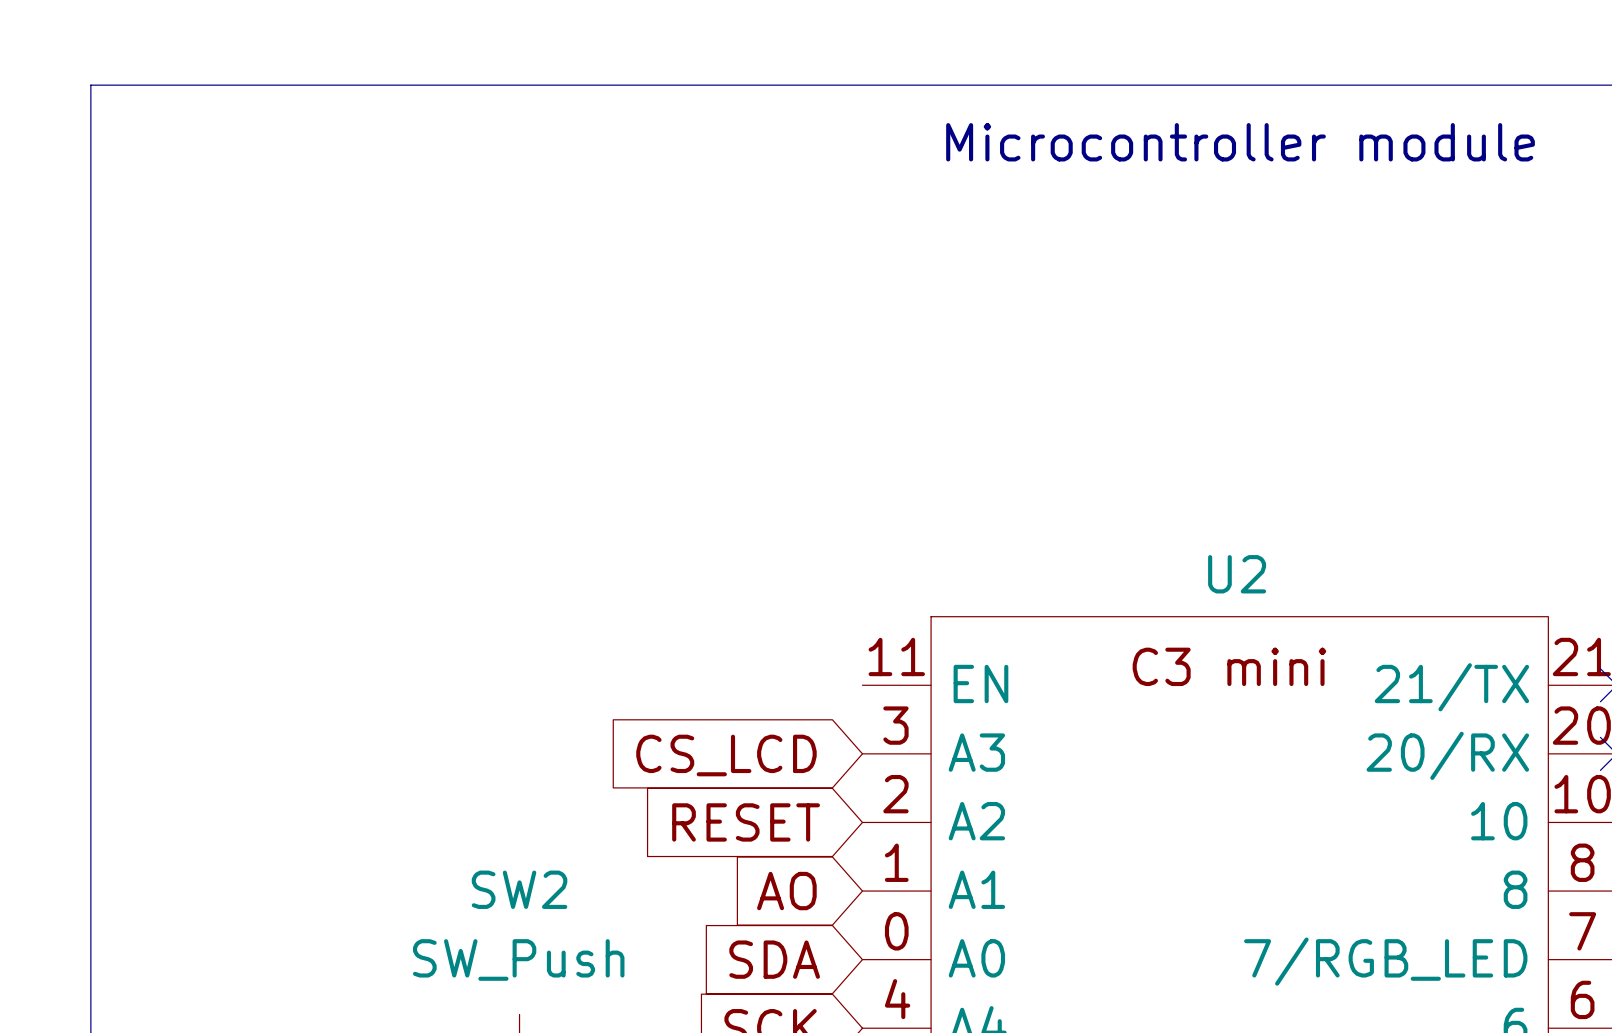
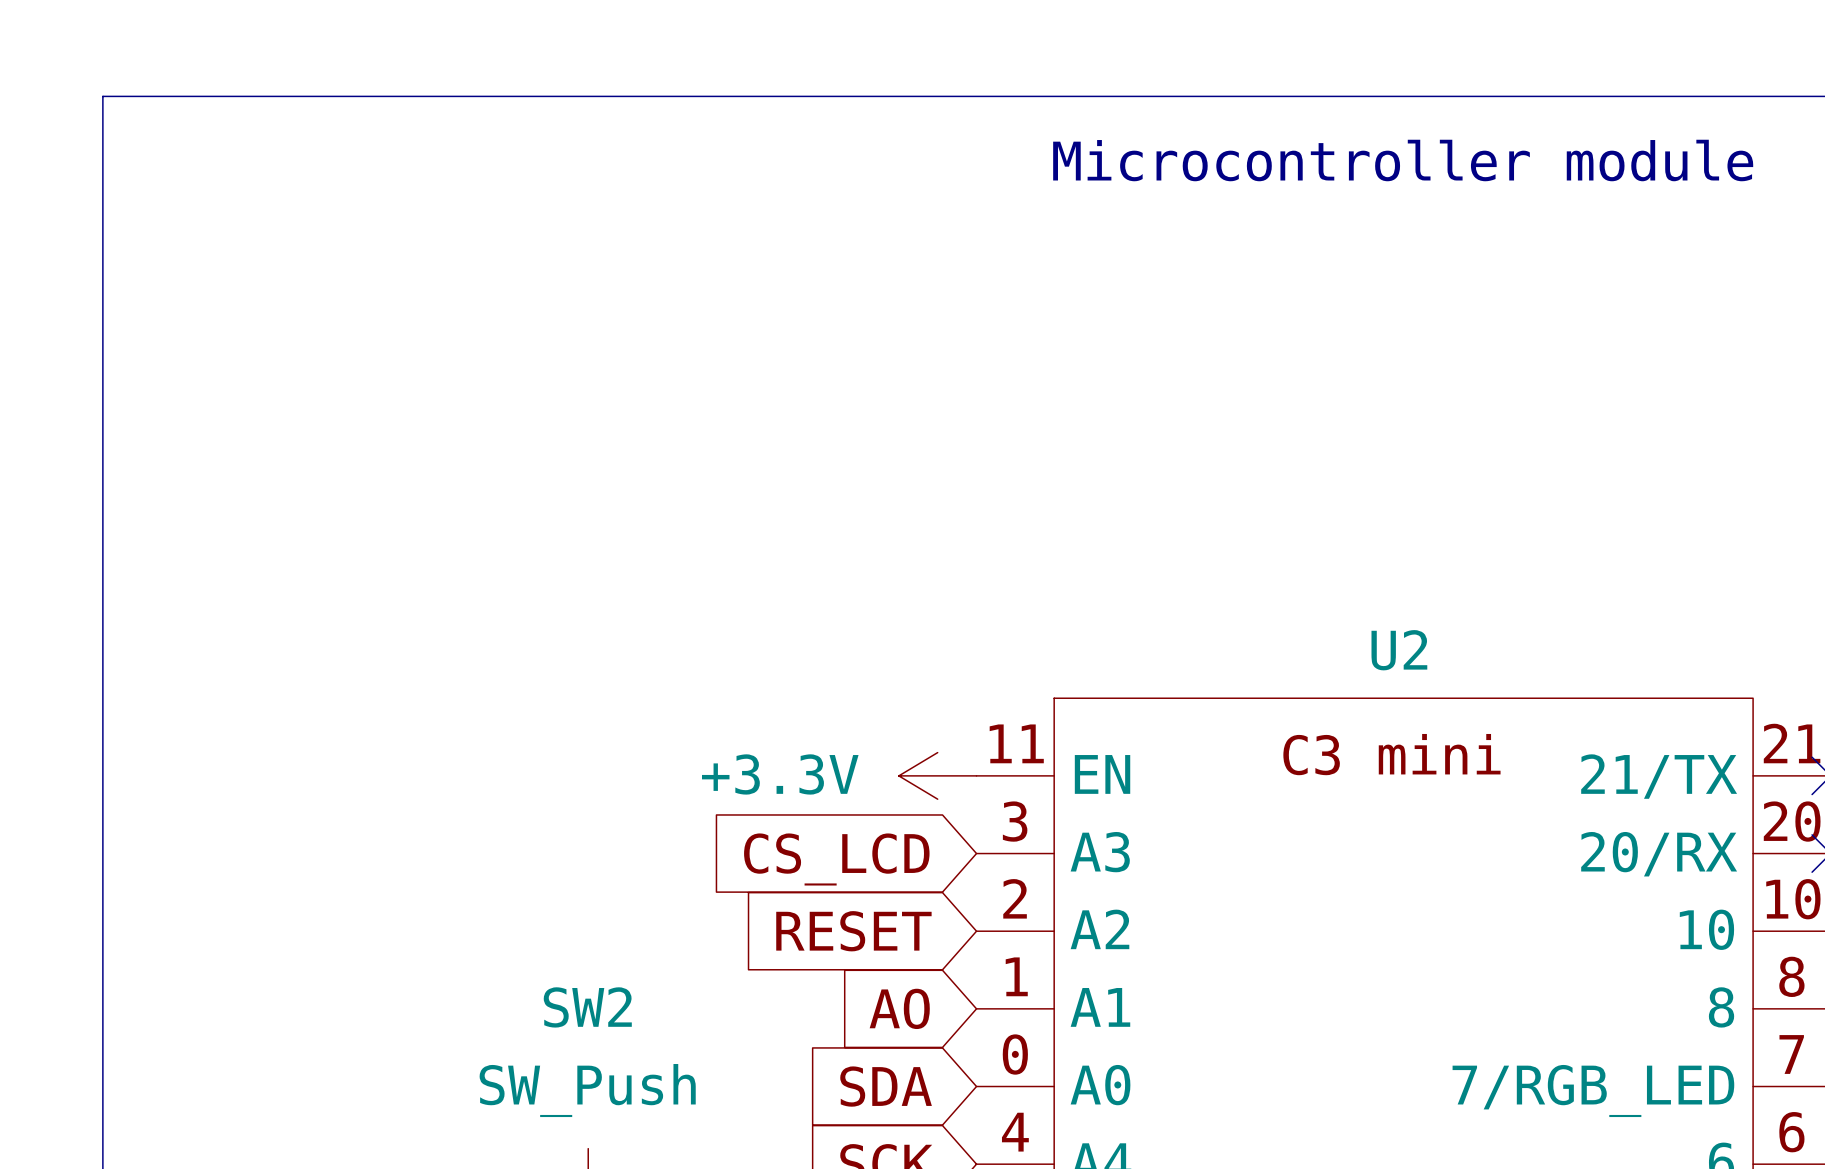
power symbol: none -> +3.3V (937, 775)

